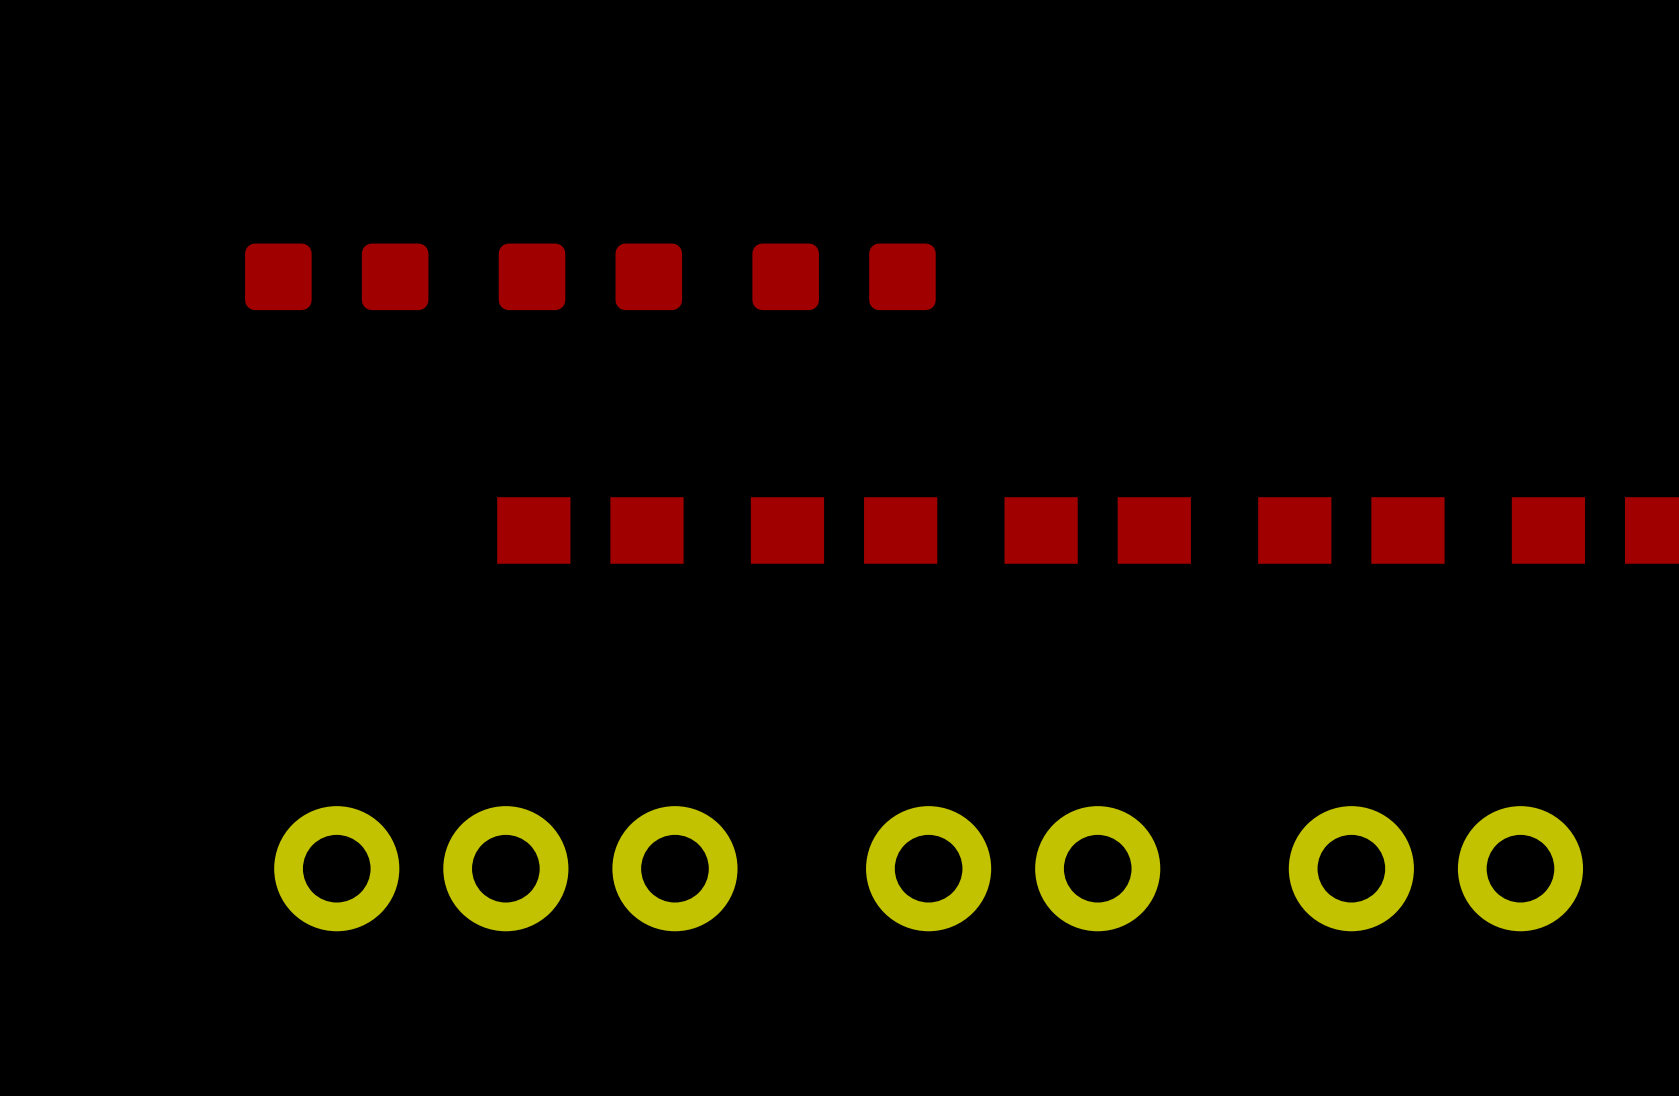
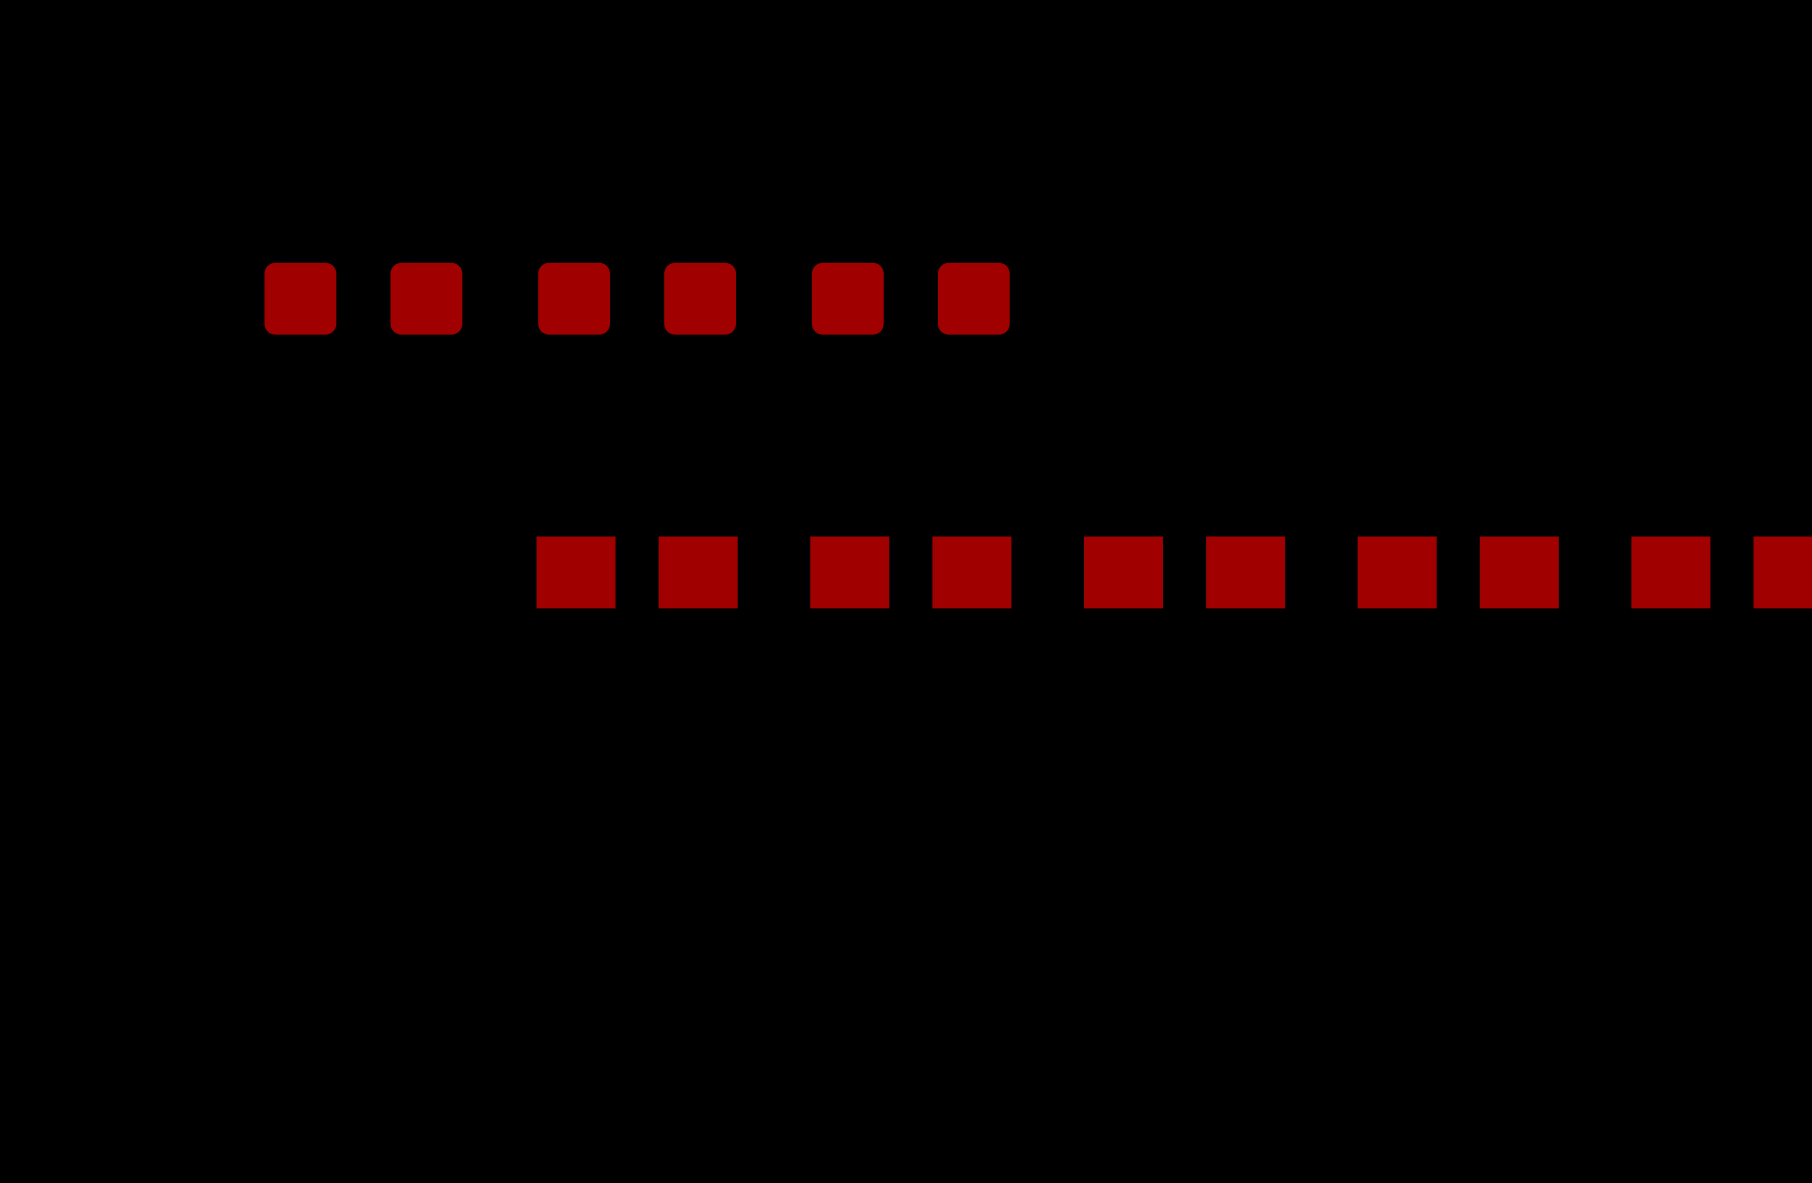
part: (505, 868) -> none
part: (1013, 868) -> none
part: (1435, 868) -> none

